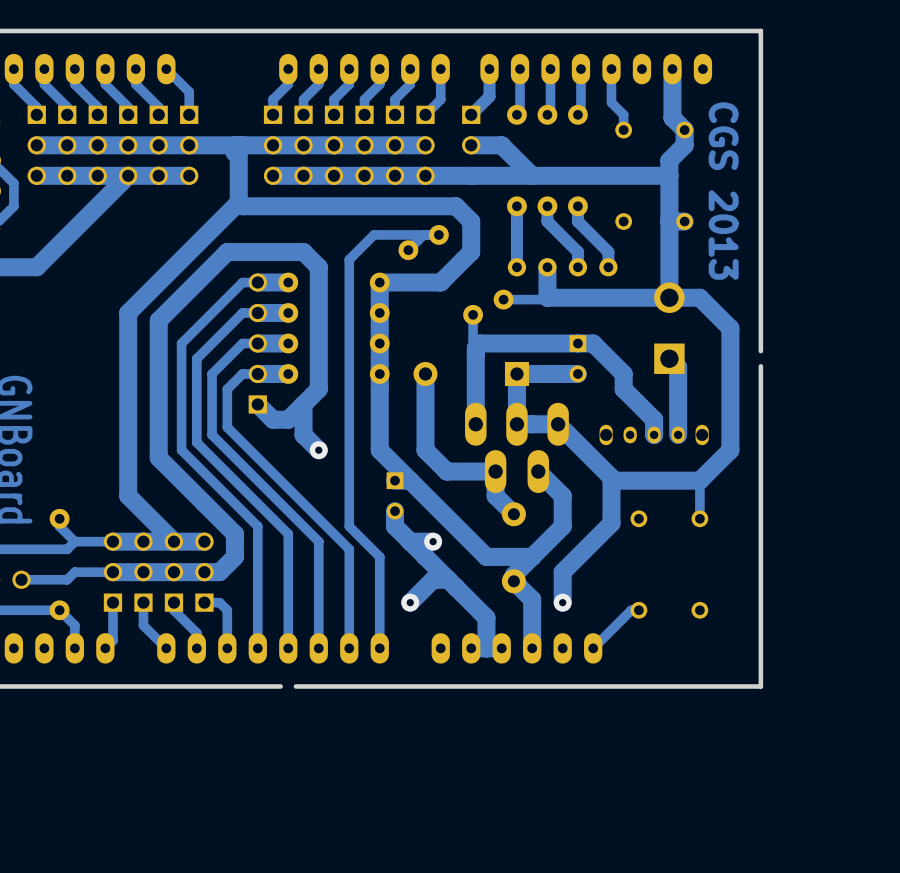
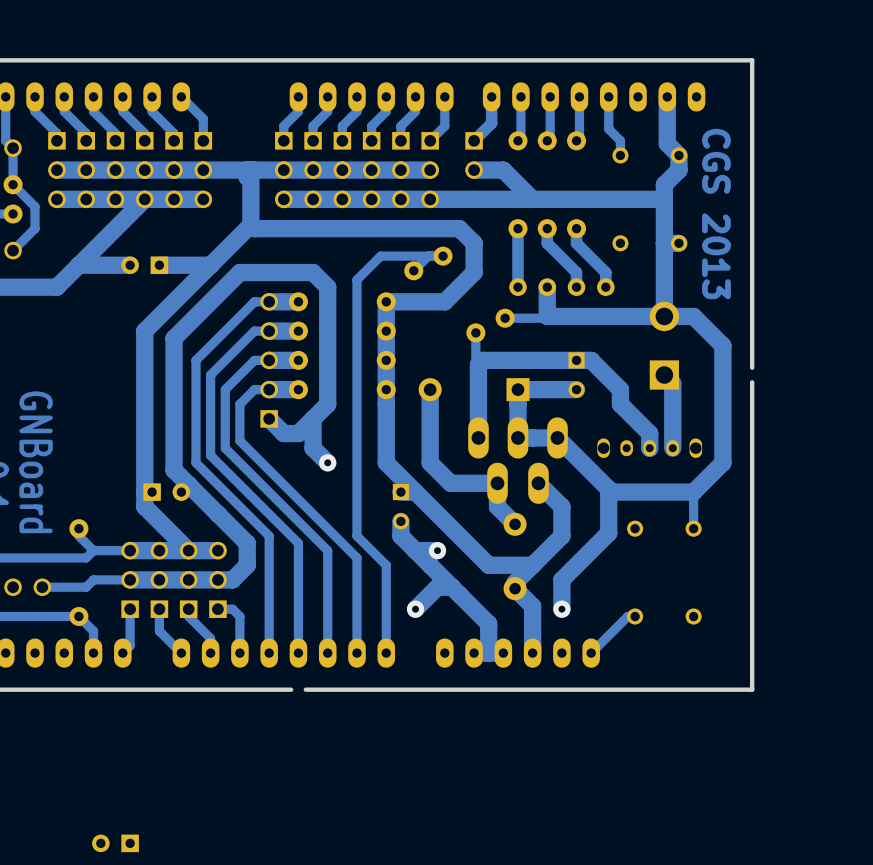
track: none -> (130, 265) (78, 265)
part: none -> (144, 265)
track: none -> (210, 265) (159, 265)
part: none -> (166, 492)
part: none -> (115, 843)

